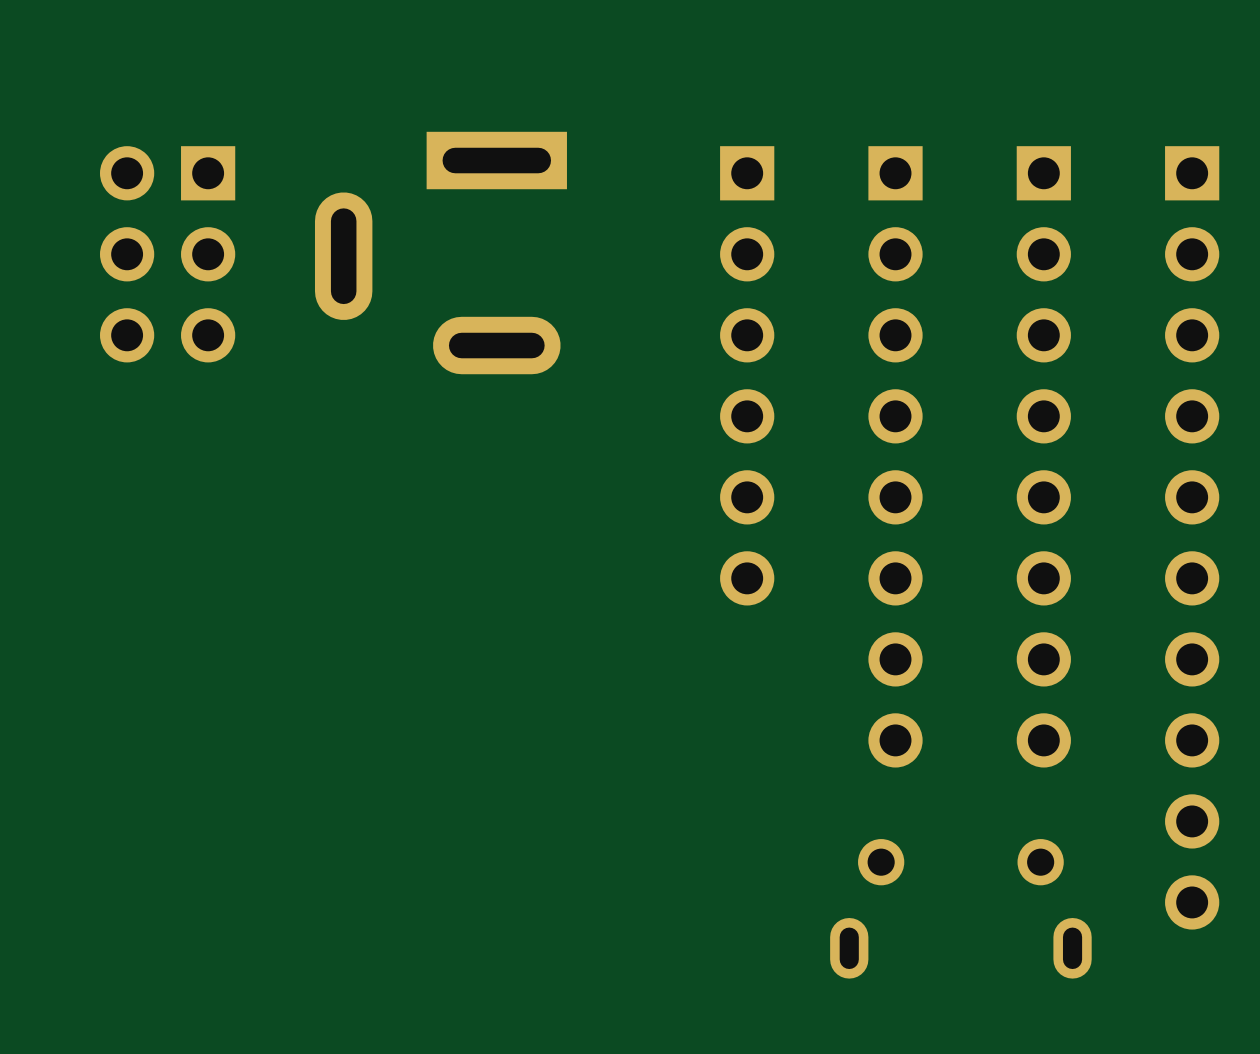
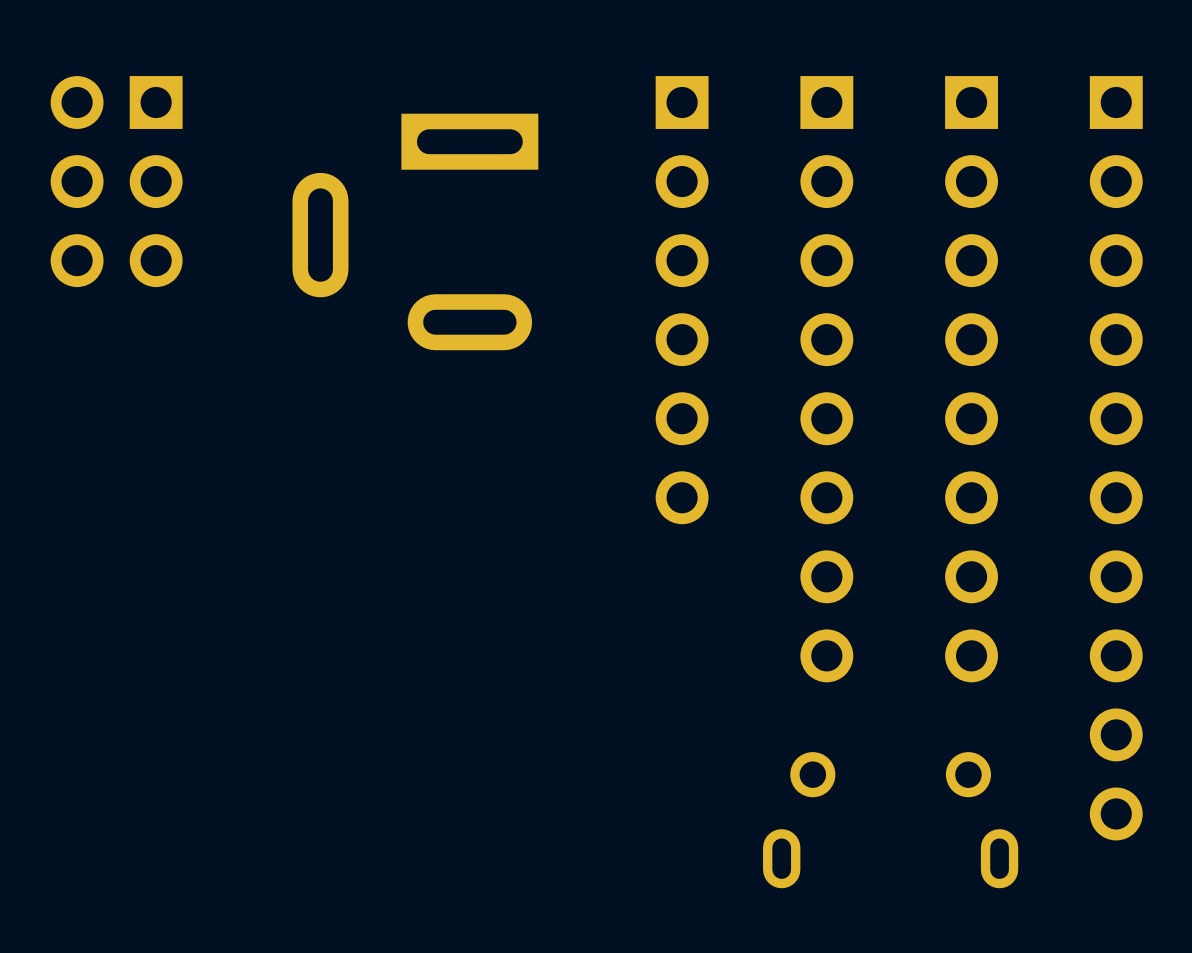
part position: (440, 253) -> (415, 231)

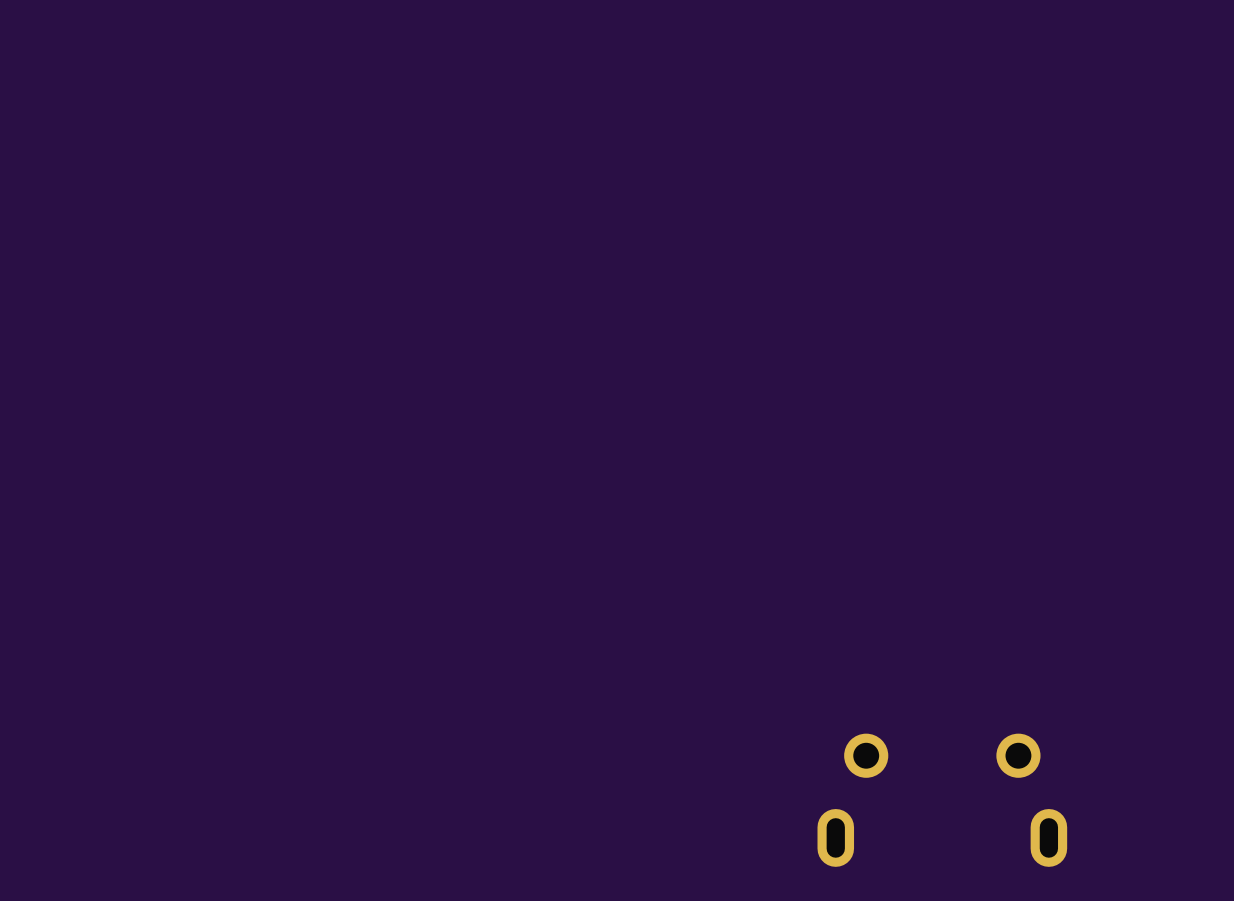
part: (116, 181) -> none
part: (415, 231) -> none
part: (682, 300) -> none
part: (826, 379) -> none
part: (971, 379) -> none
part: (1116, 458) -> none

